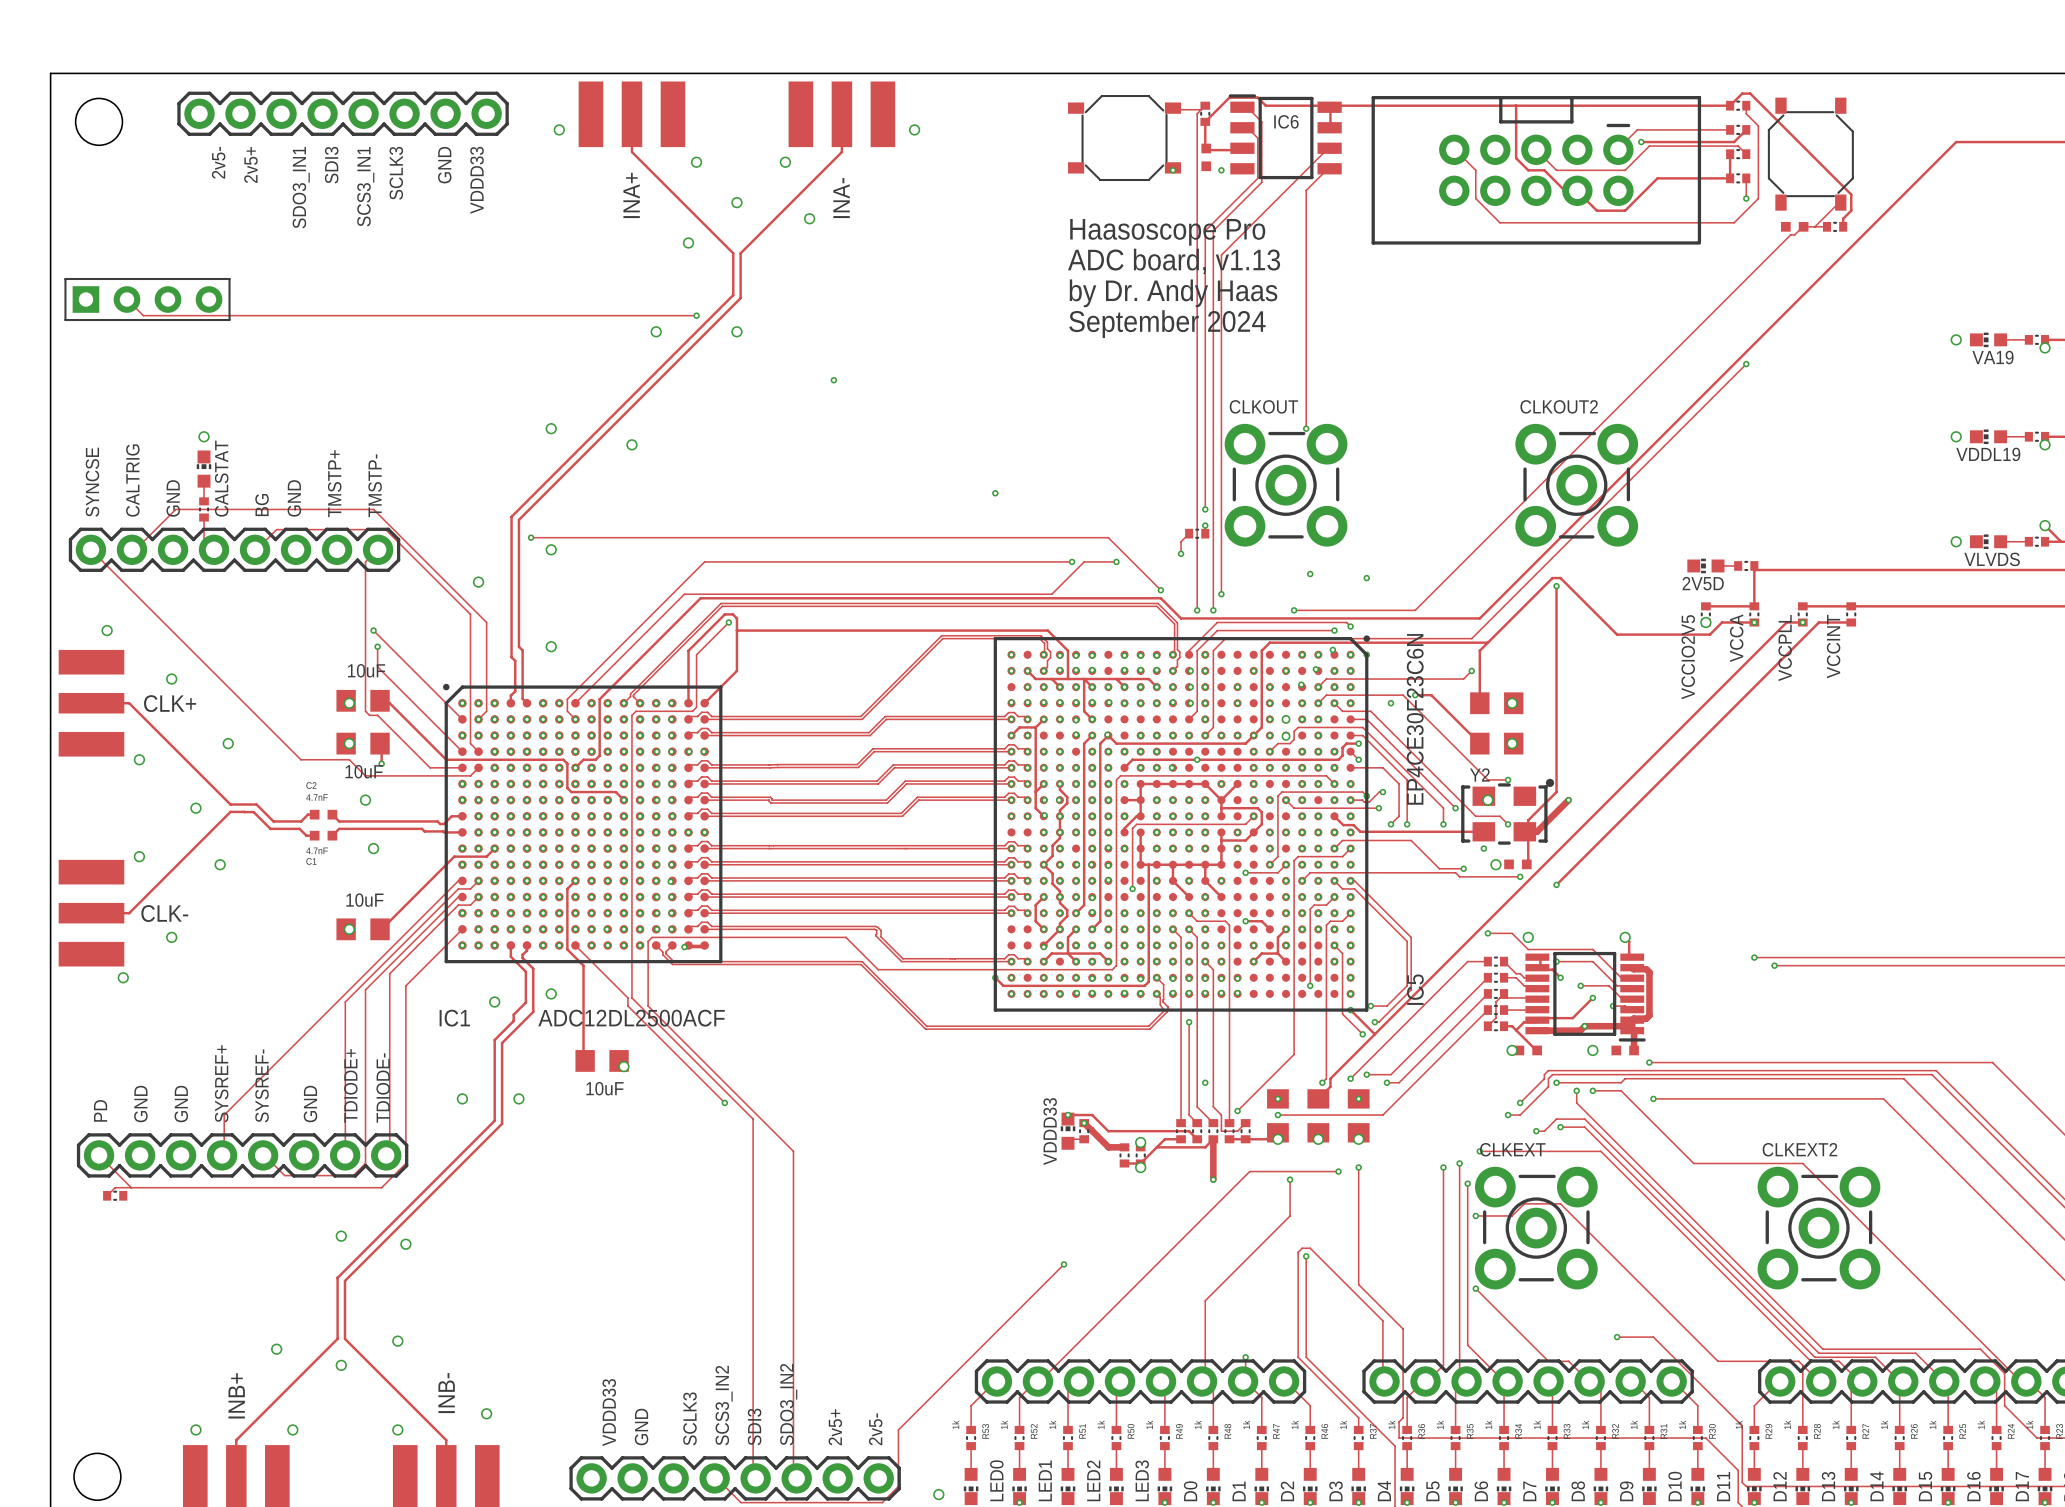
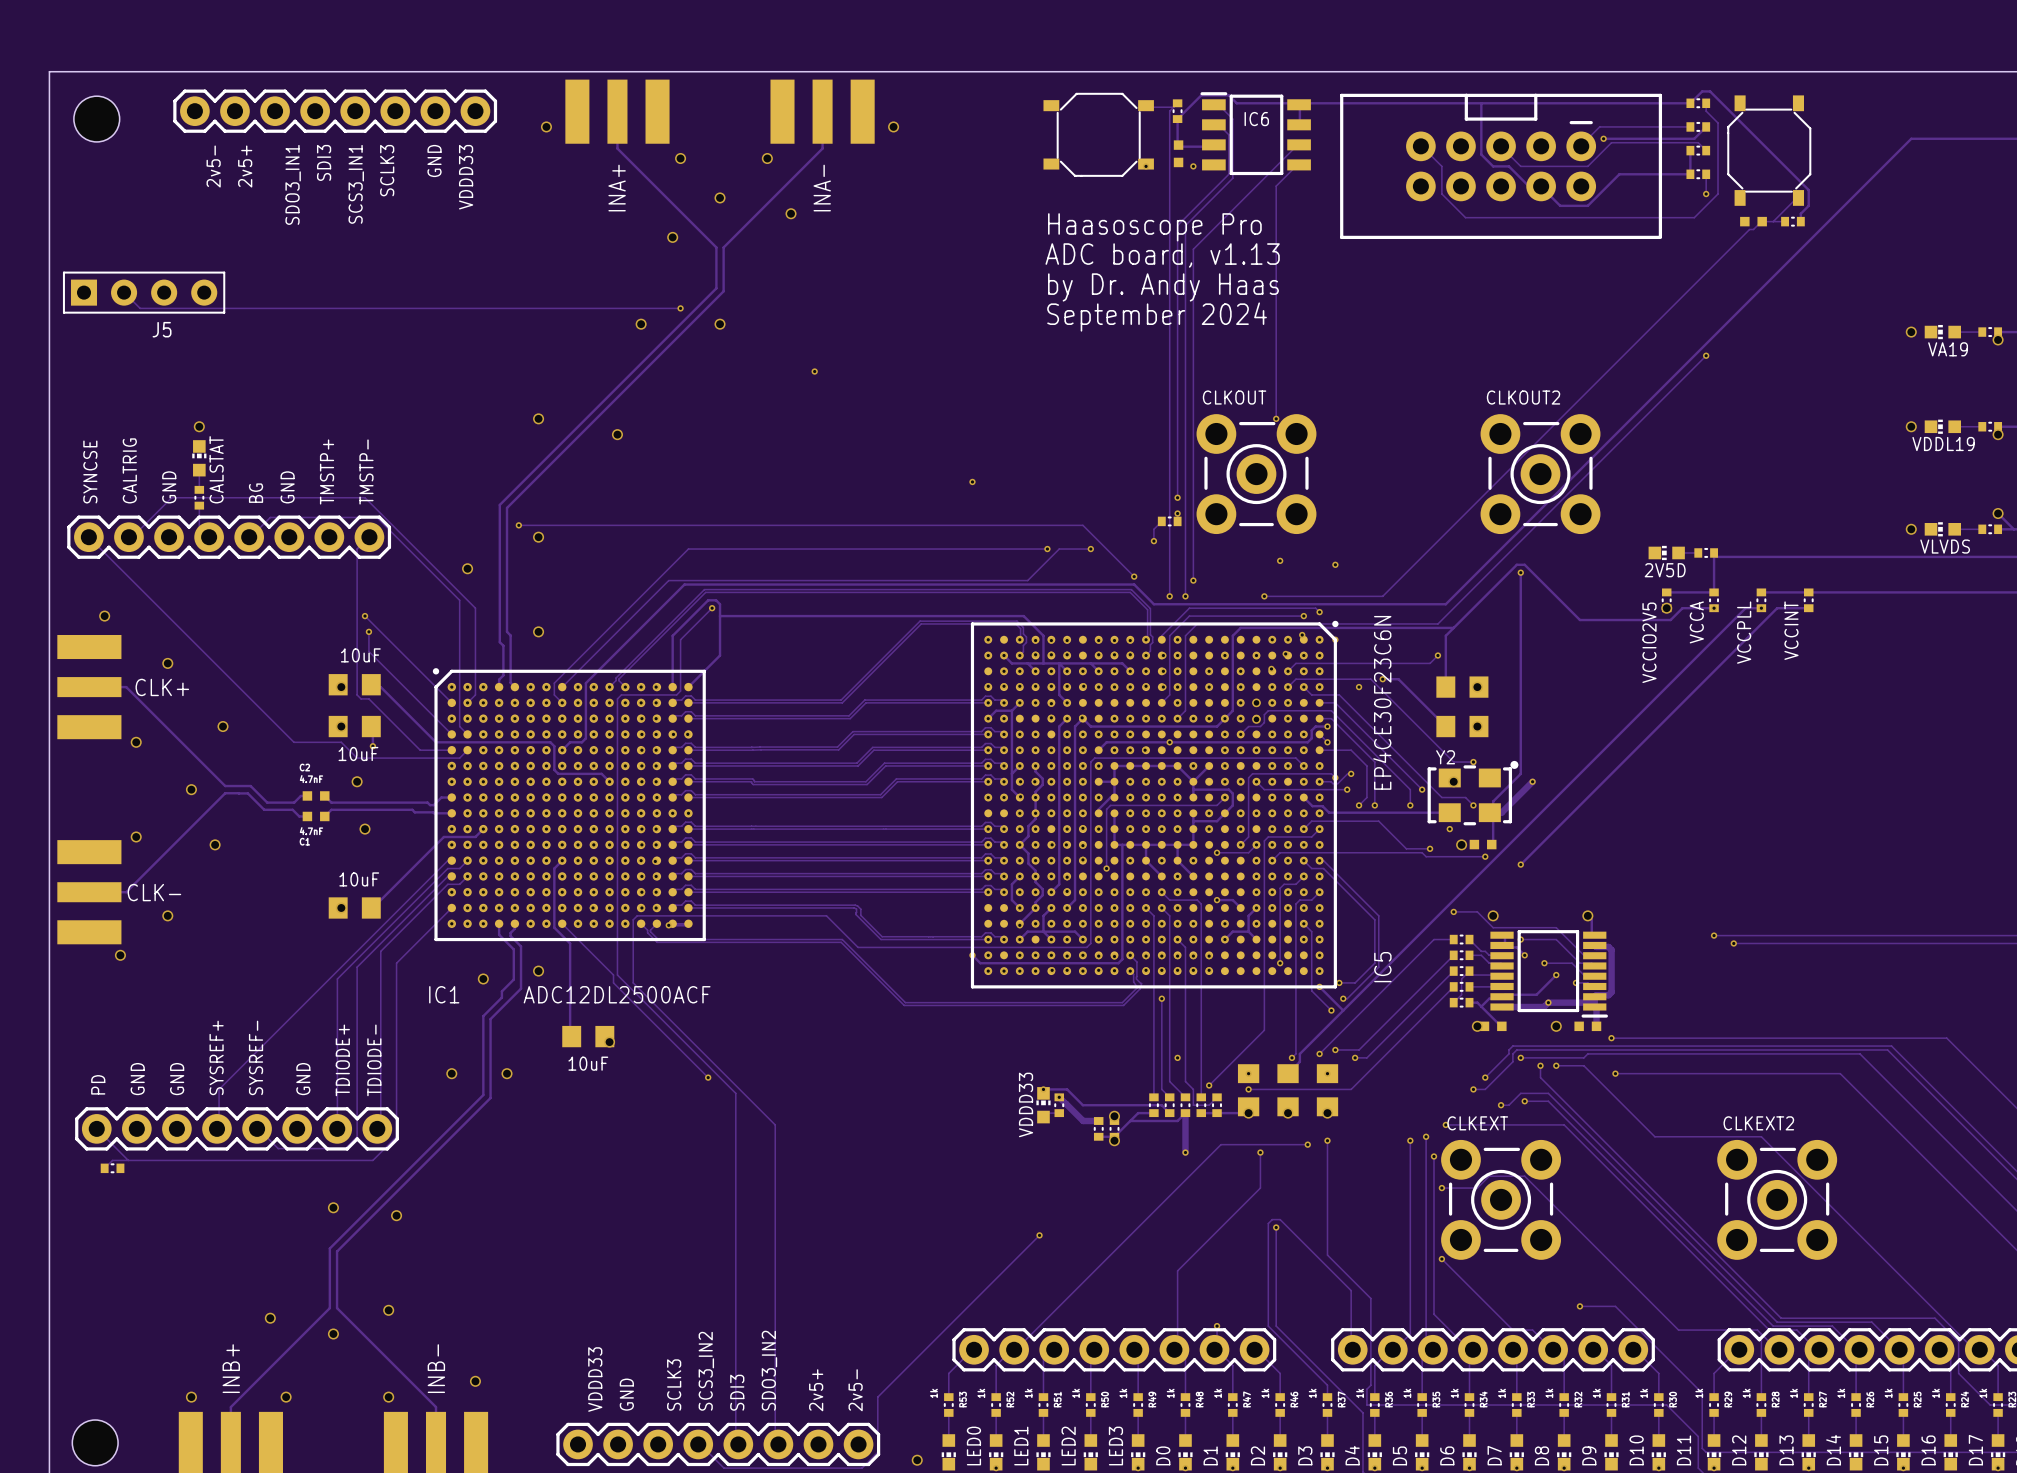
J5 name: none -> J5 (162, 329)

